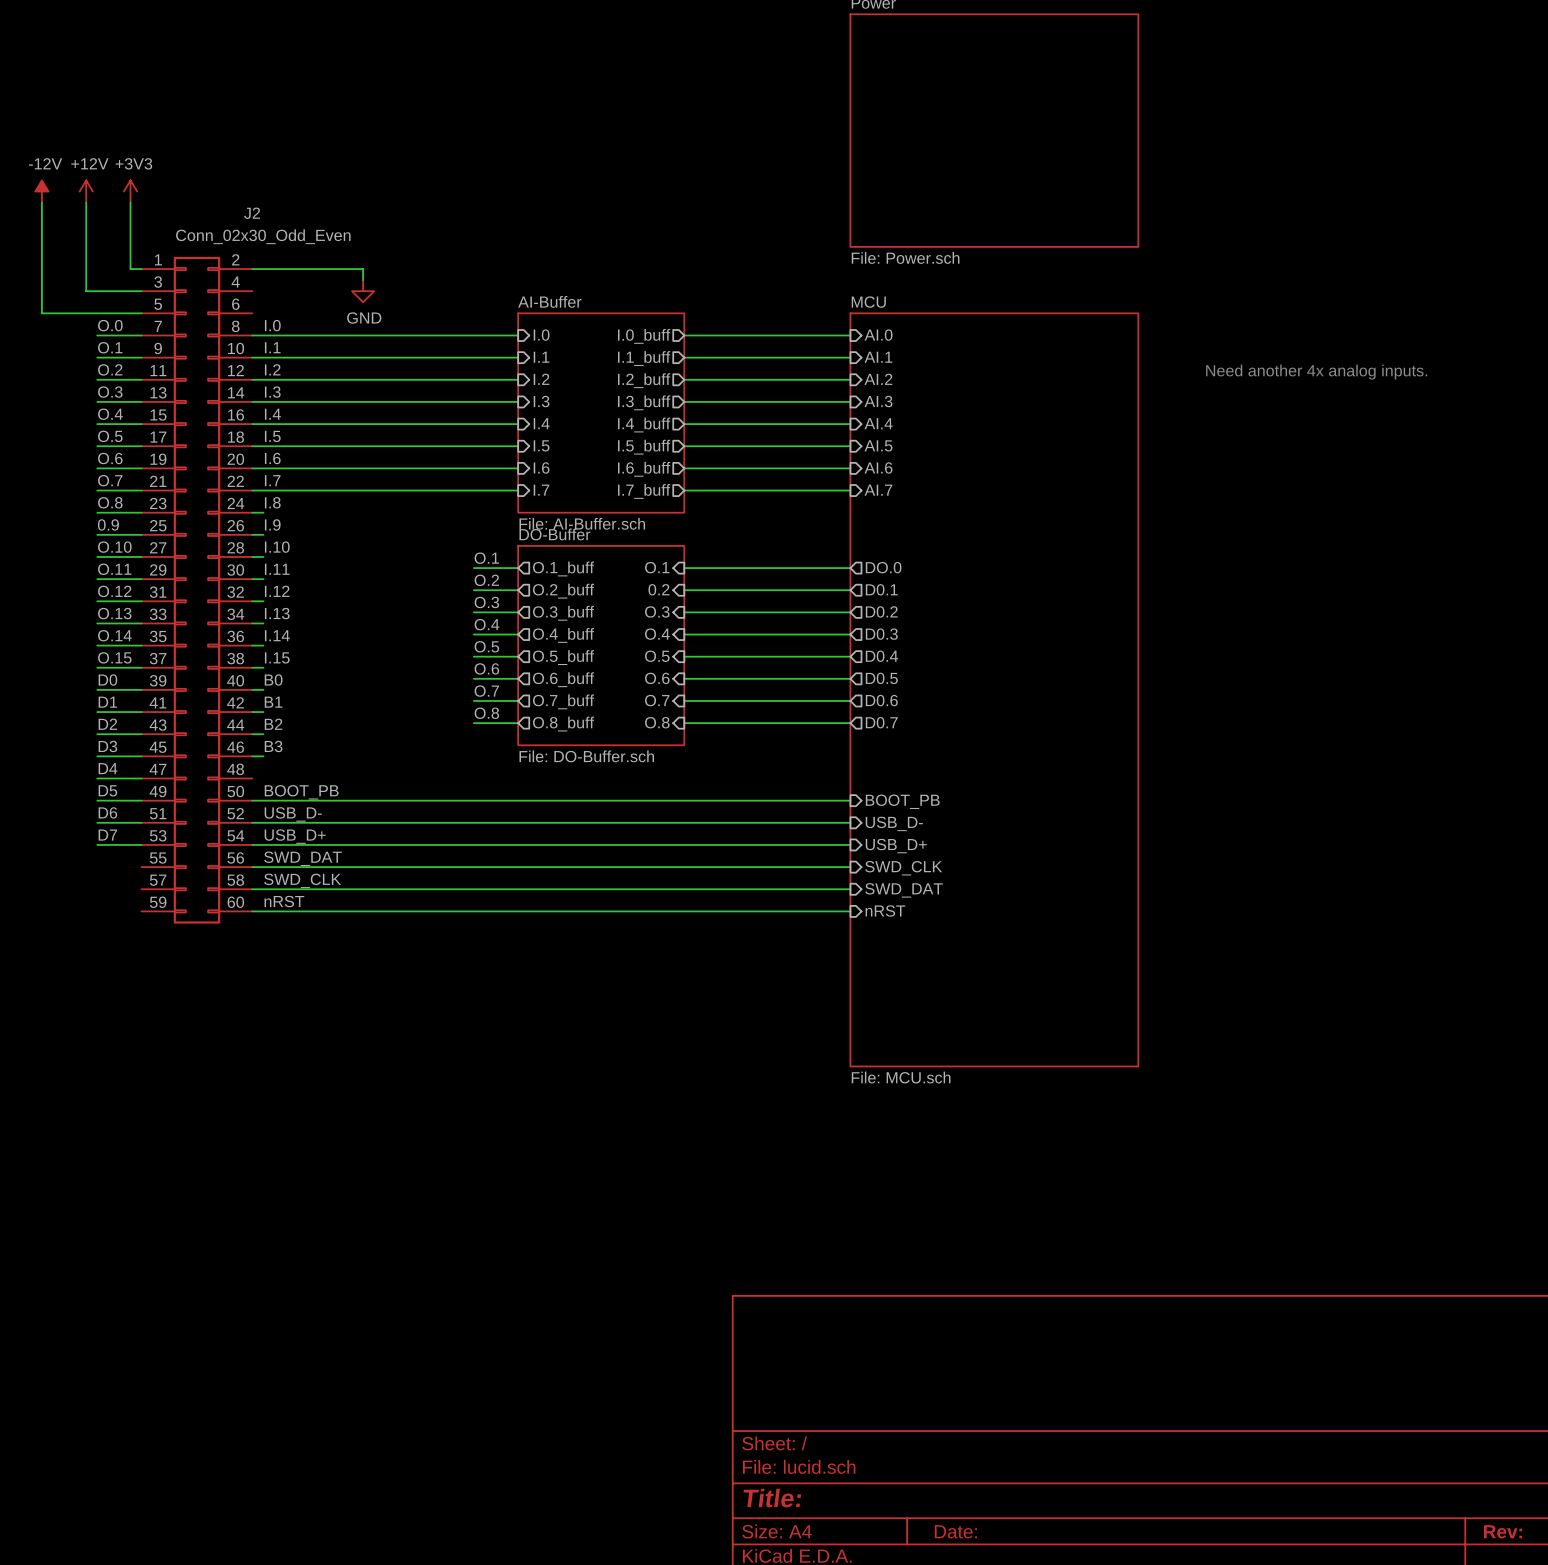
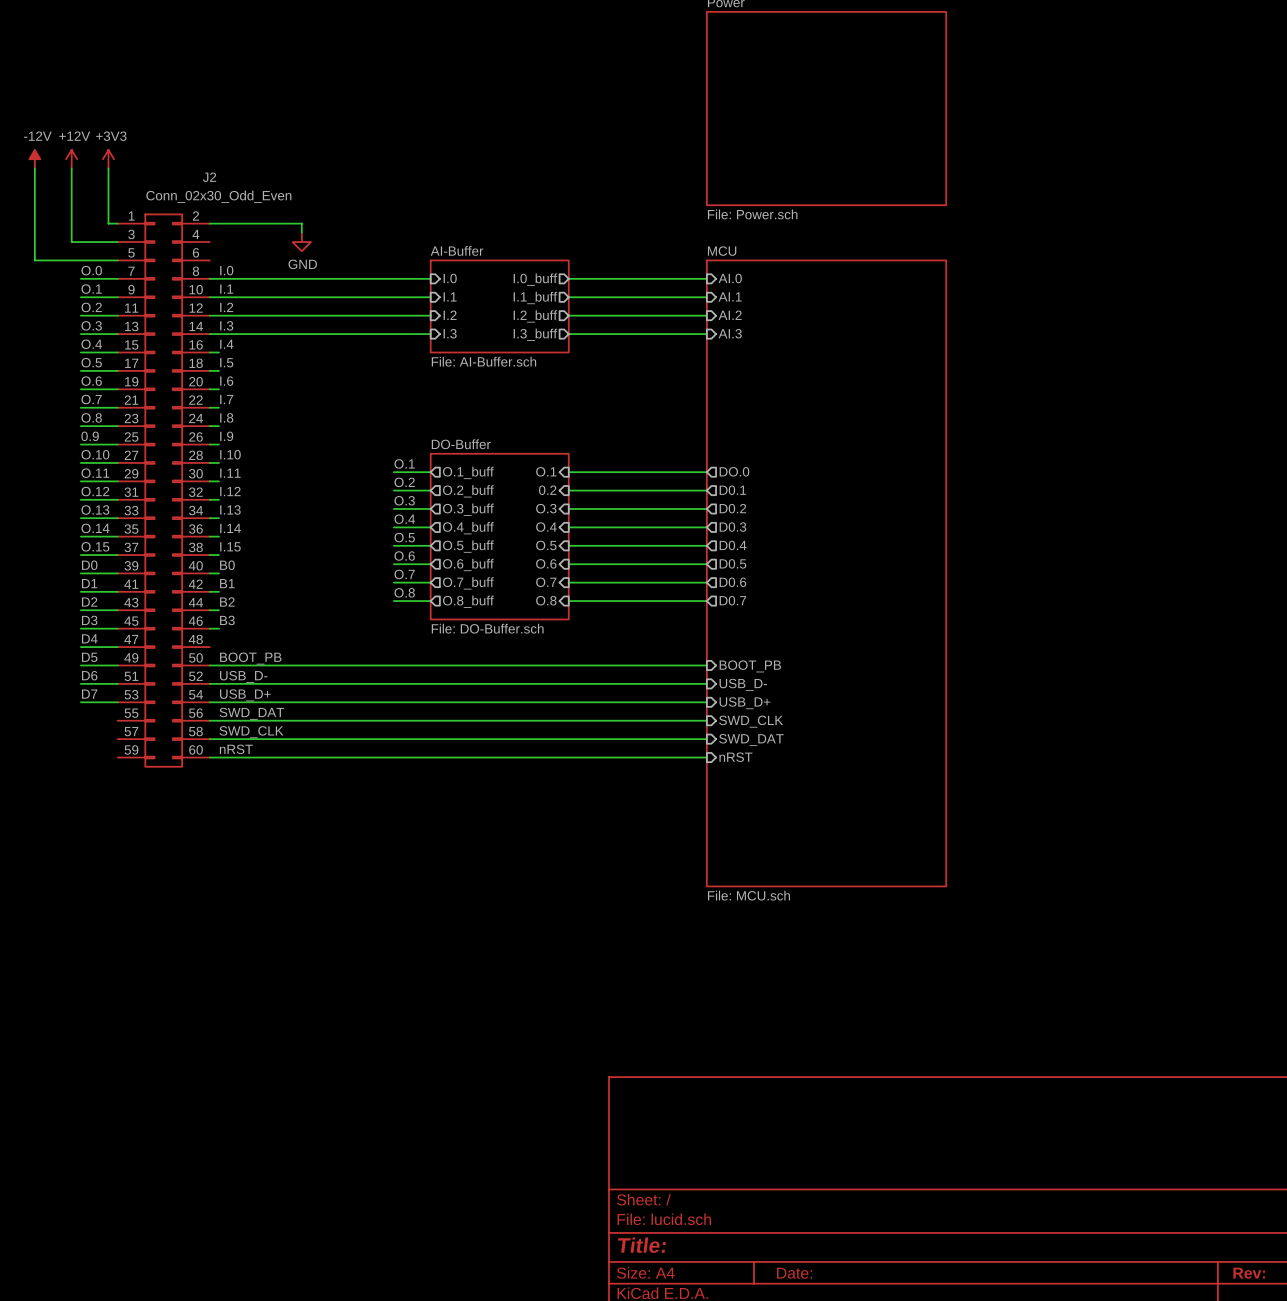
sheet AI-Buffer: none -> File: AI-Buffer.sch (499, 306)
text: Need another 4x analog inputs. (1316, 372) -> none
sheet AI-Buffer: File: AI-Buffer.sch (601, 413) -> none
sheet pin: I.4 (541, 423) -> none
sheet pin: AI.4 (878, 423) -> none
wire: (263, 424) (518, 424) -> none
sheet pin: I.4_buff (644, 424) -> none
wire: (684, 424) (850, 424) -> none
sheet pin: I.5 (541, 445) -> none
sheet pin: AI.5 (878, 445) -> none
wire: (263, 446) (518, 446) -> none
wire: (684, 446) (850, 446) -> none
sheet pin: I.5_buff (644, 447) -> none
sheet pin: I.6 (541, 467) -> none
sheet pin: AI.6 (878, 467) -> none
wire: (263, 468) (518, 468) -> none
wire: (684, 468) (850, 468) -> none
sheet pin: I.6_buff (644, 469) -> none
wire: (263, 490) (518, 490) -> none
sheet pin: I.7 (541, 490) -> none
wire: (684, 490) (850, 490) -> none
sheet pin: AI.7 (878, 490) -> none
sheet pin: I.7_buff (644, 491) -> none

